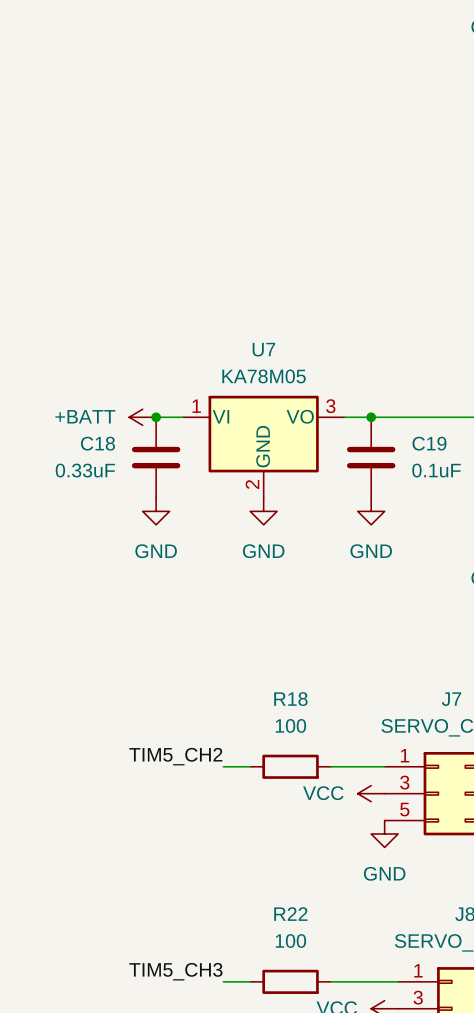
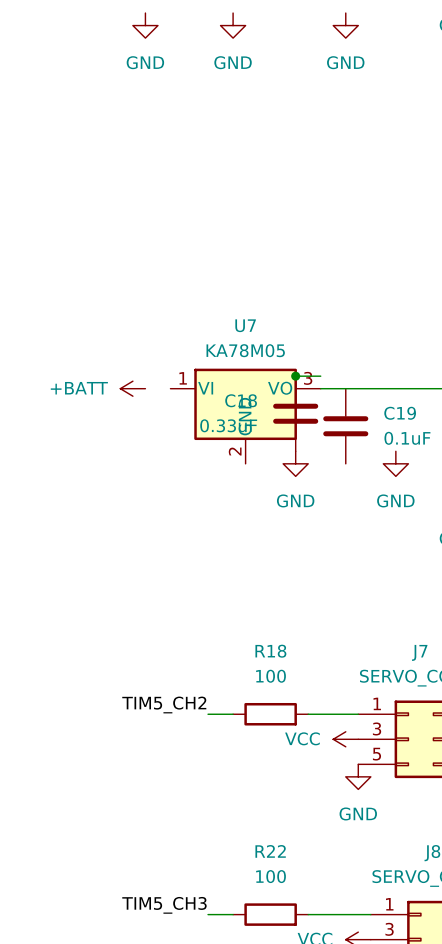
power symbol: none -> GND (145, 25)
power symbol: none -> GND (233, 25)
power symbol: none -> GND (345, 25)
wire: (156, 417) (183, 417) -> (295, 376) (320, 376)
junction: (156, 417) -> none
junction position: (371, 417) -> (295, 376)
C18 position: (156, 457) -> (295, 413)
power symbol: none -> GND (295, 463)
power symbol: none -> GND (395, 463)
power symbol: GND (156, 511) -> none
power symbol: GND (263, 511) -> none
power symbol: GND (371, 511) -> none

